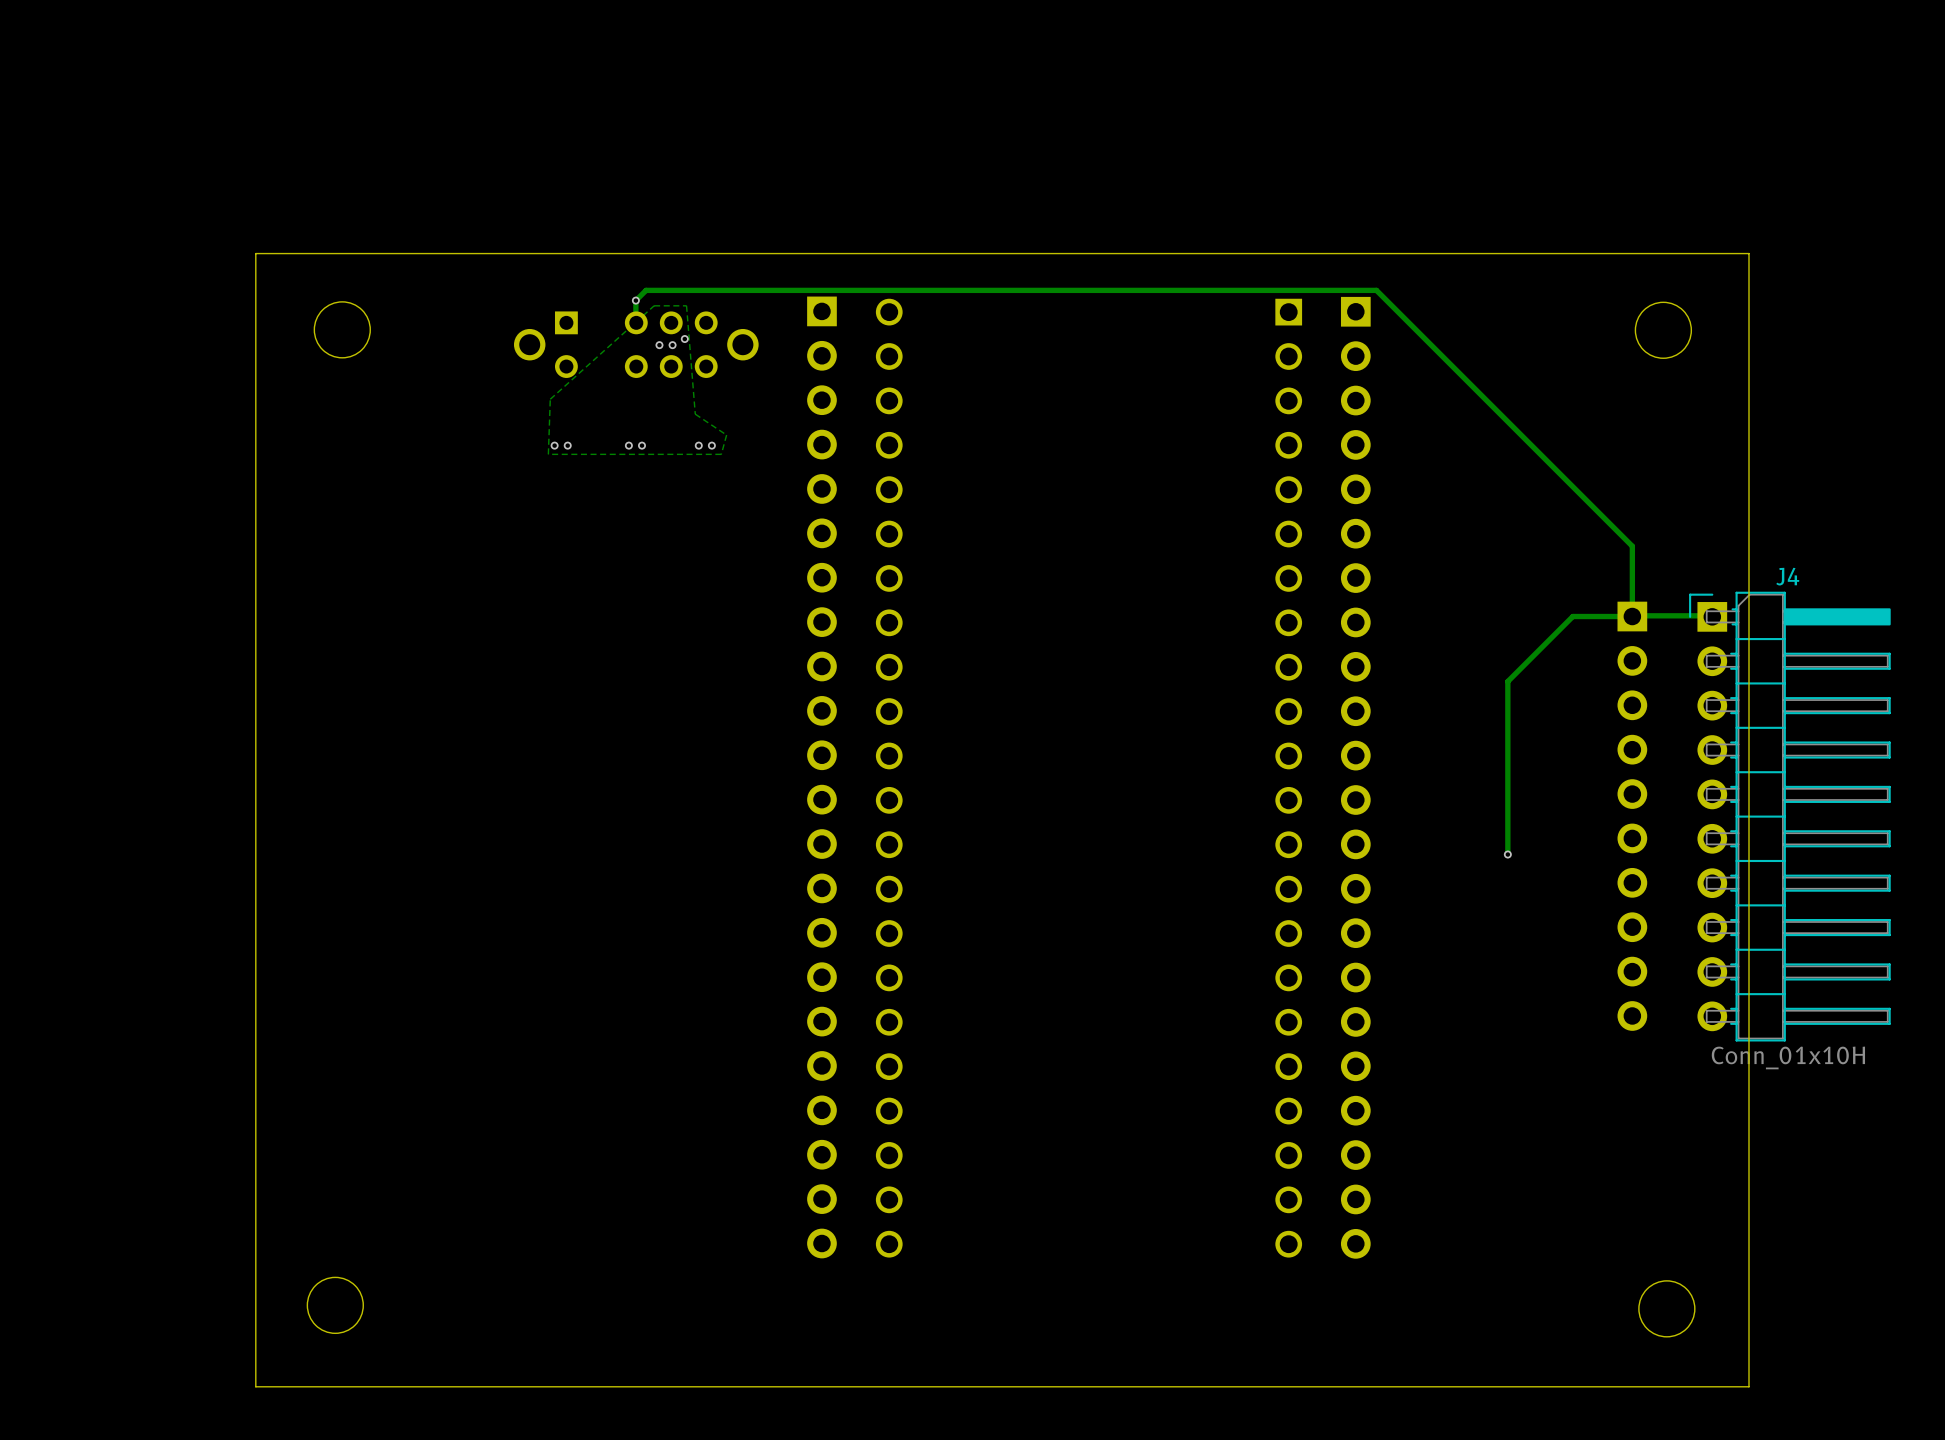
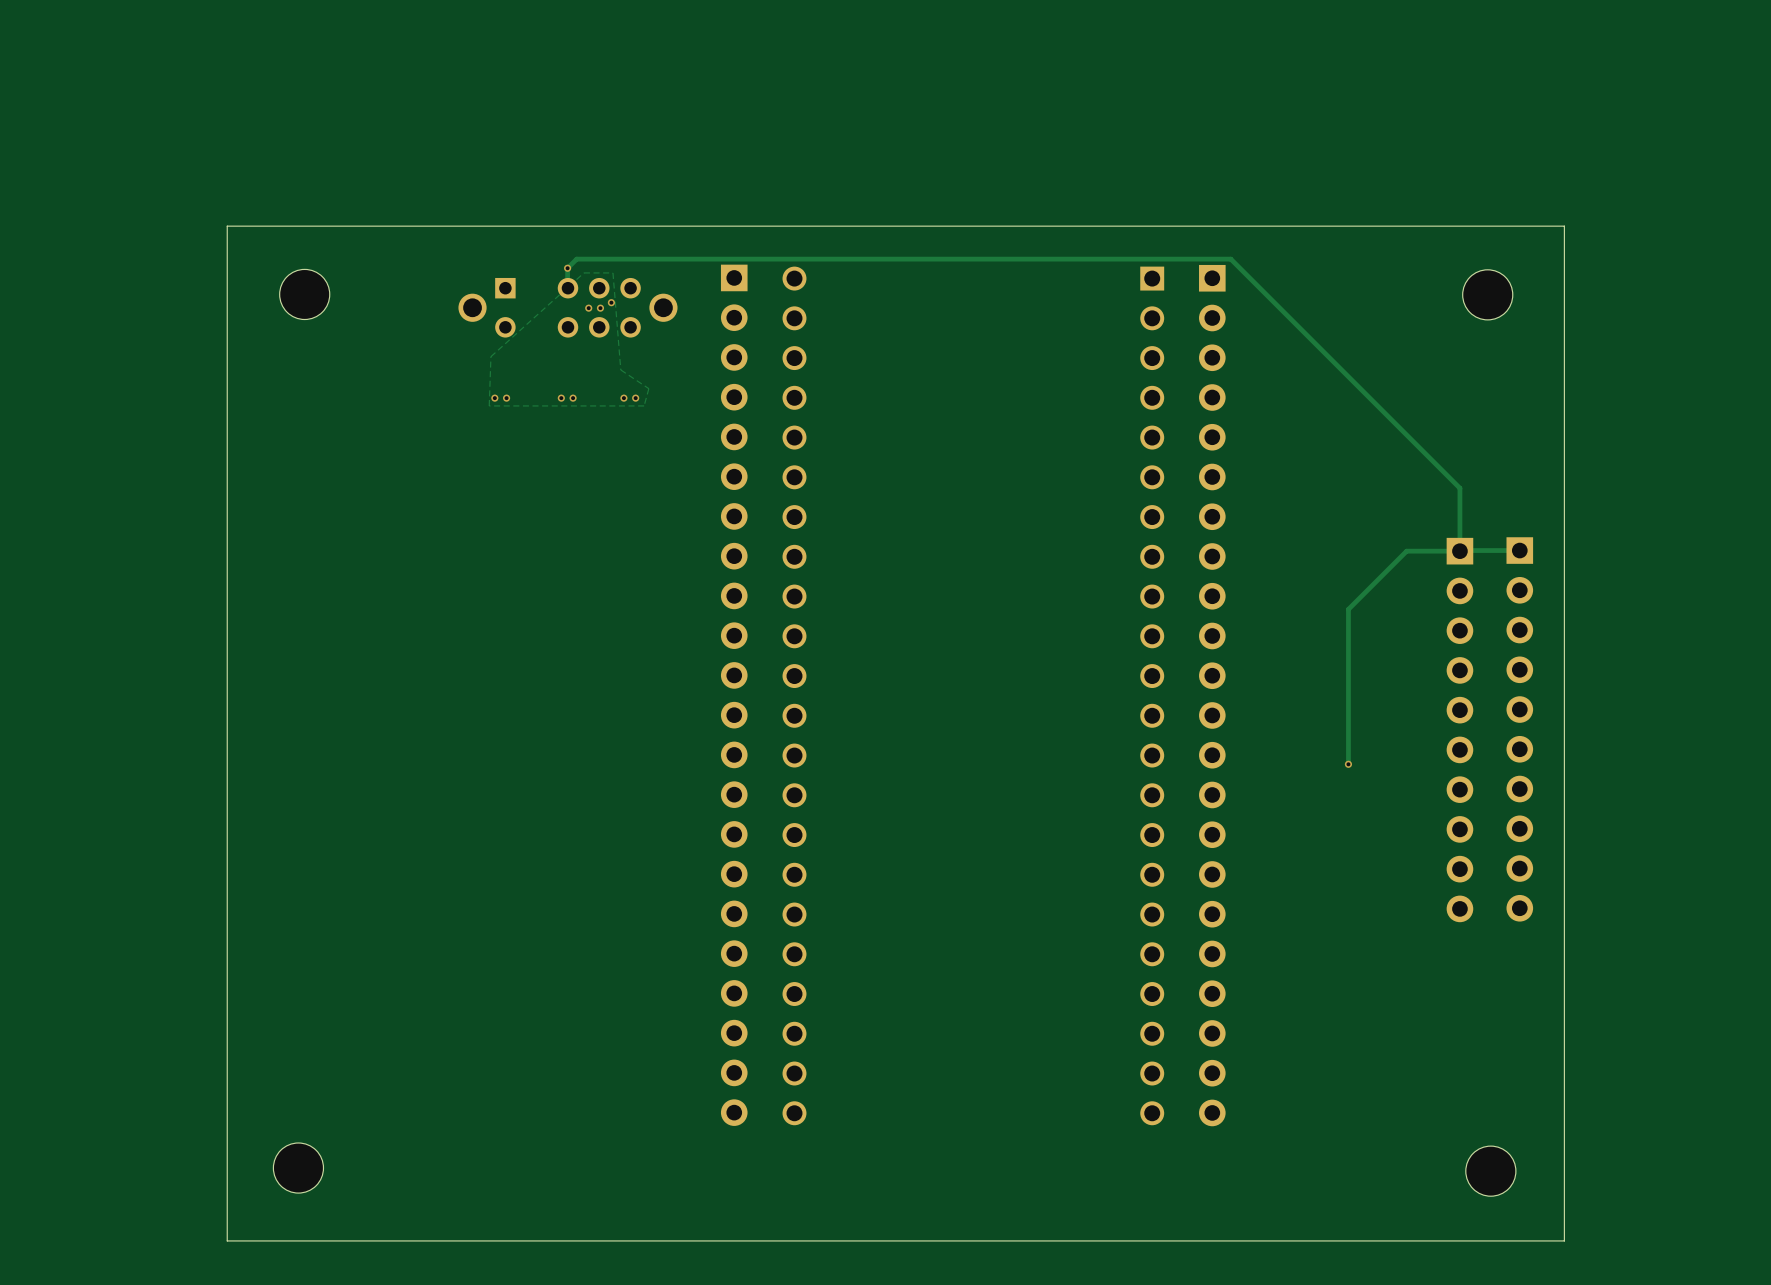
J4 side: bottom (1789, 816) -> top (1519, 729)

